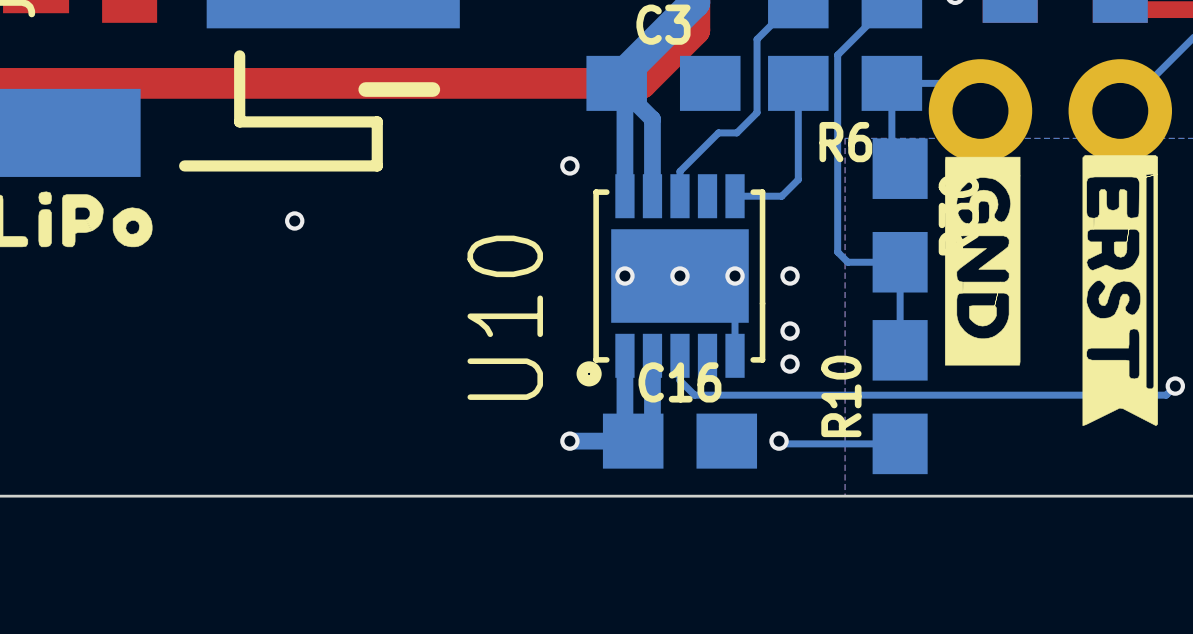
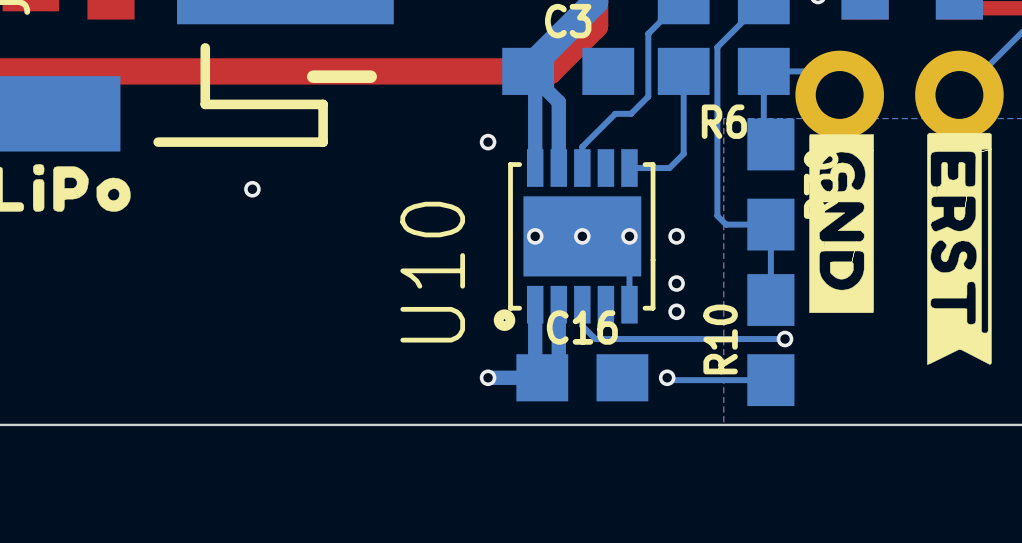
bottom track: (1175, 386) (1166, 395) (694, 395) -> (785, 339) (595, 339)
via: (1175, 386) -> none
via: none -> (785, 339)

